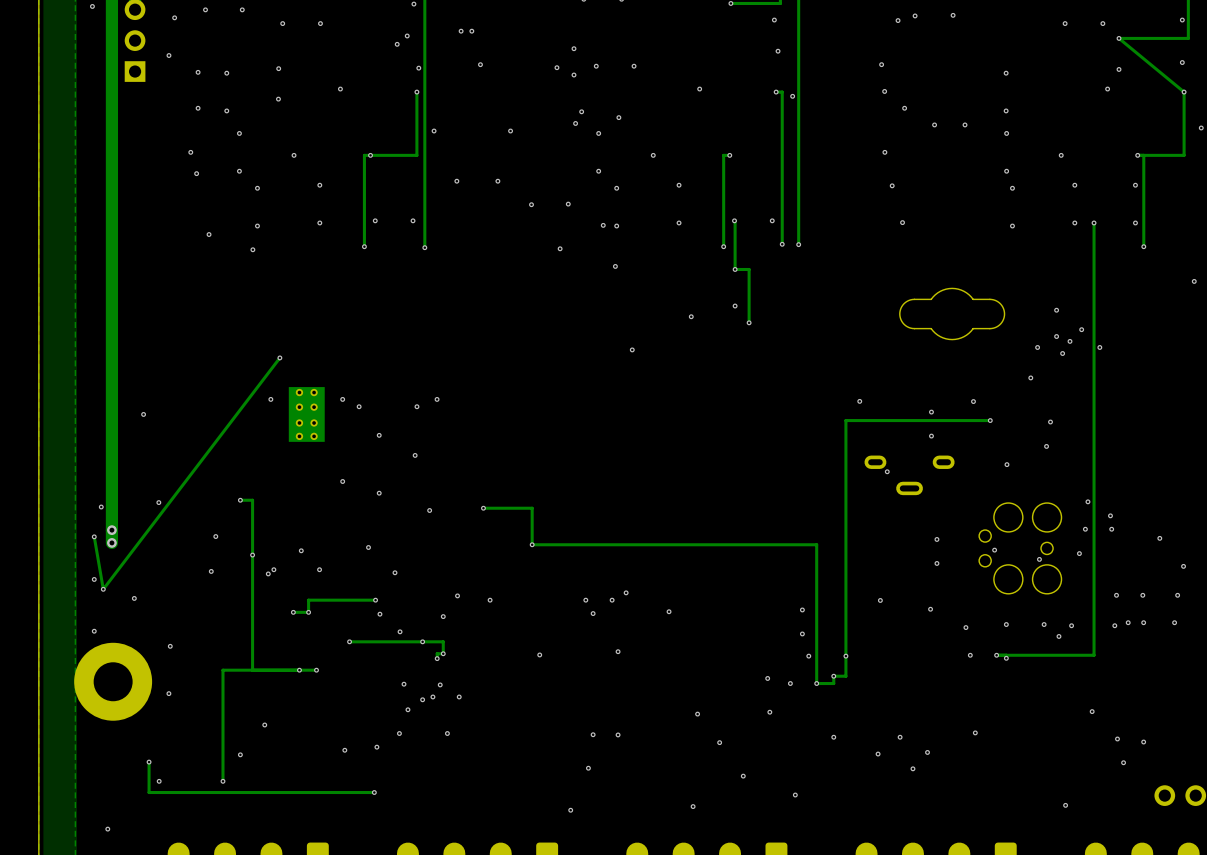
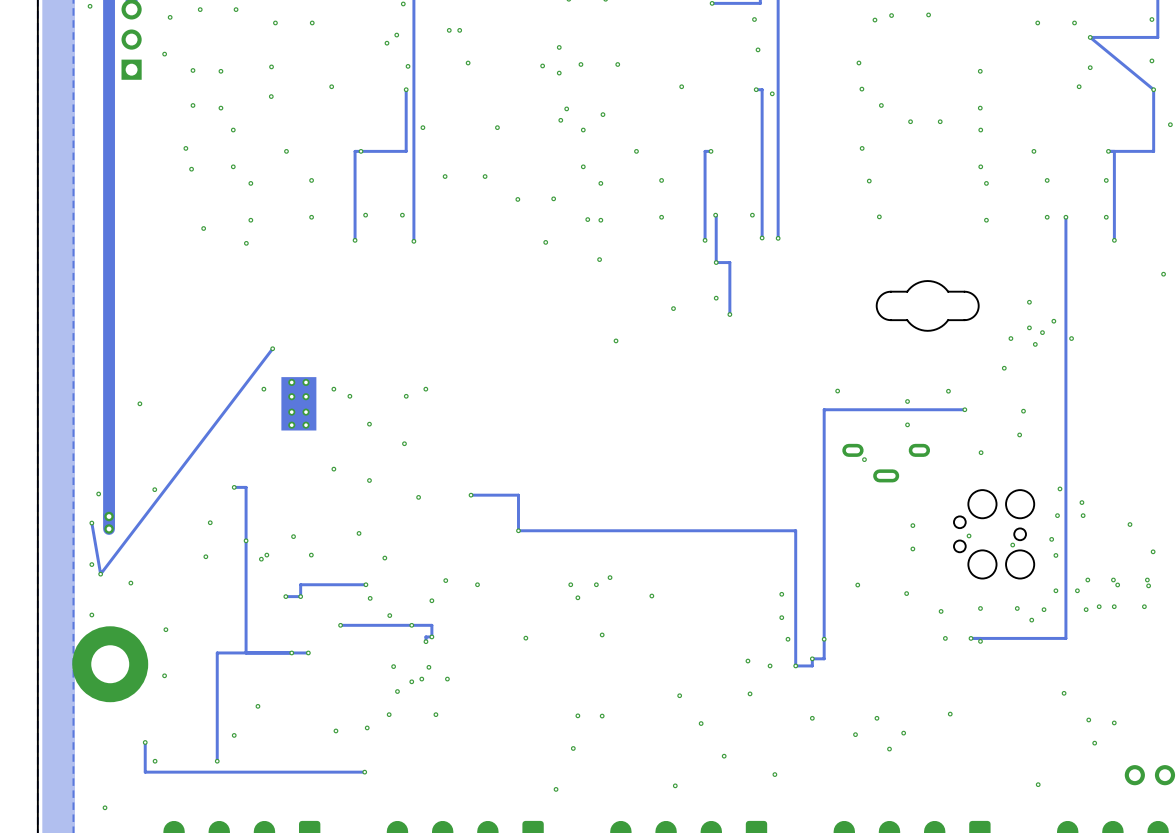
via: none -> (1055, 555)
via: none -> (1117, 584)
via: none -> (1148, 585)
via: none -> (1055, 590)
via: none -> (1077, 590)

